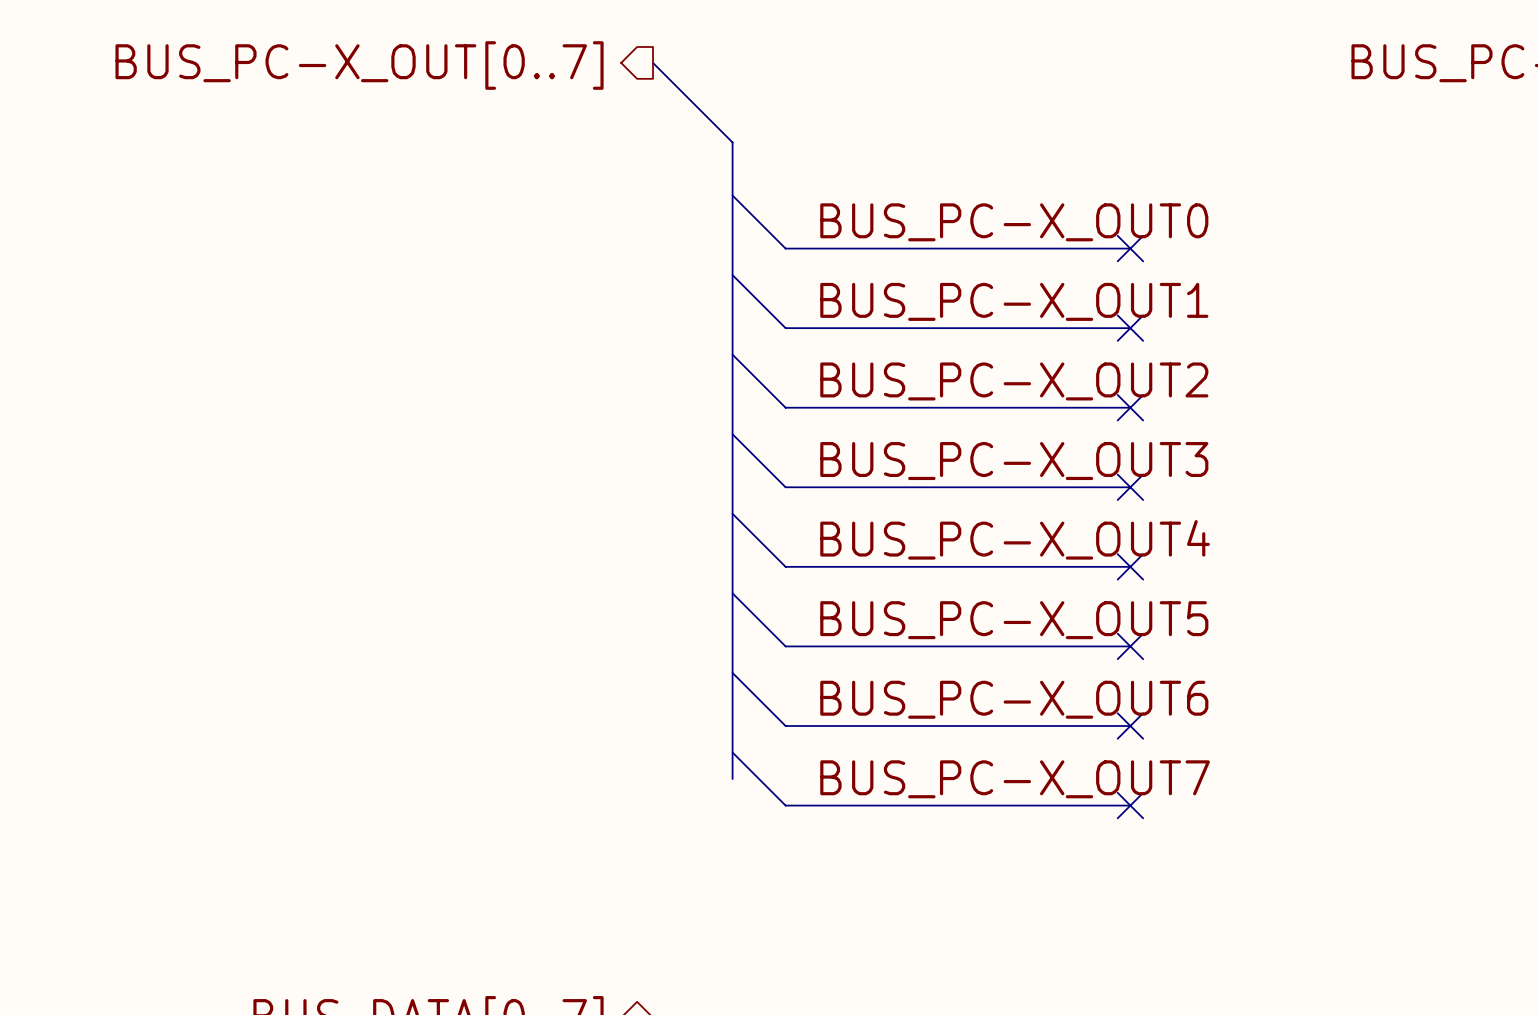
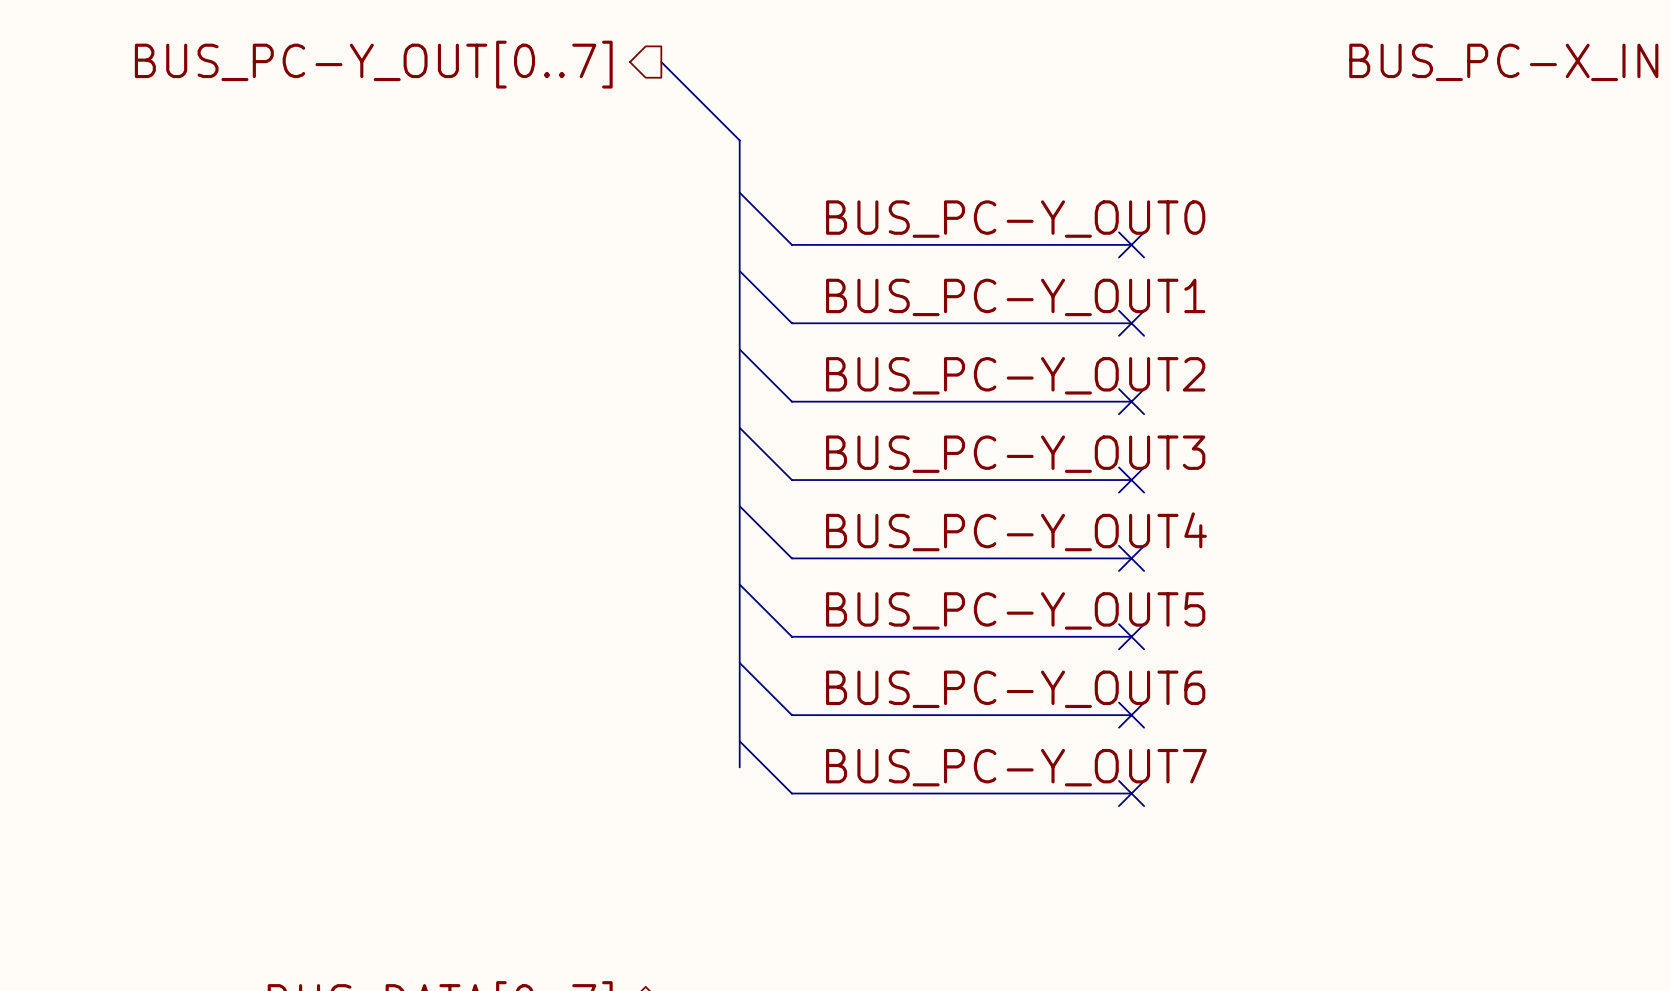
hierarchical label: BUS_PC-X_OUT[0..7] (359, 65) -> BUS_PC-Y_OUT[0..7] (373, 64)
label: BUS_PC-X_OUT0 (1014, 222) -> BUS_PC-Y_OUT0 (1015, 219)
label: BUS_PC-X_OUT1 (1014, 301) -> BUS_PC-Y_OUT1 (1015, 297)
label: BUS_PC-X_OUT2 (1014, 381) -> BUS_PC-Y_OUT2 (1015, 375)
label: BUS_PC-X_OUT3 (1014, 461) -> BUS_PC-Y_OUT3 (1015, 454)
label: BUS_PC-X_OUT4 (1015, 539) -> BUS_PC-Y_OUT4 (1016, 531)
label: BUS_PC-X_OUT5 (1014, 620) -> BUS_PC-Y_OUT5 (1015, 610)
label: BUS_PC-X_OUT6 (1014, 699) -> BUS_PC-Y_OUT6 (1015, 689)
label: BUS_PC-X_OUT7 (1015, 779) -> BUS_PC-Y_OUT7 (1016, 767)

